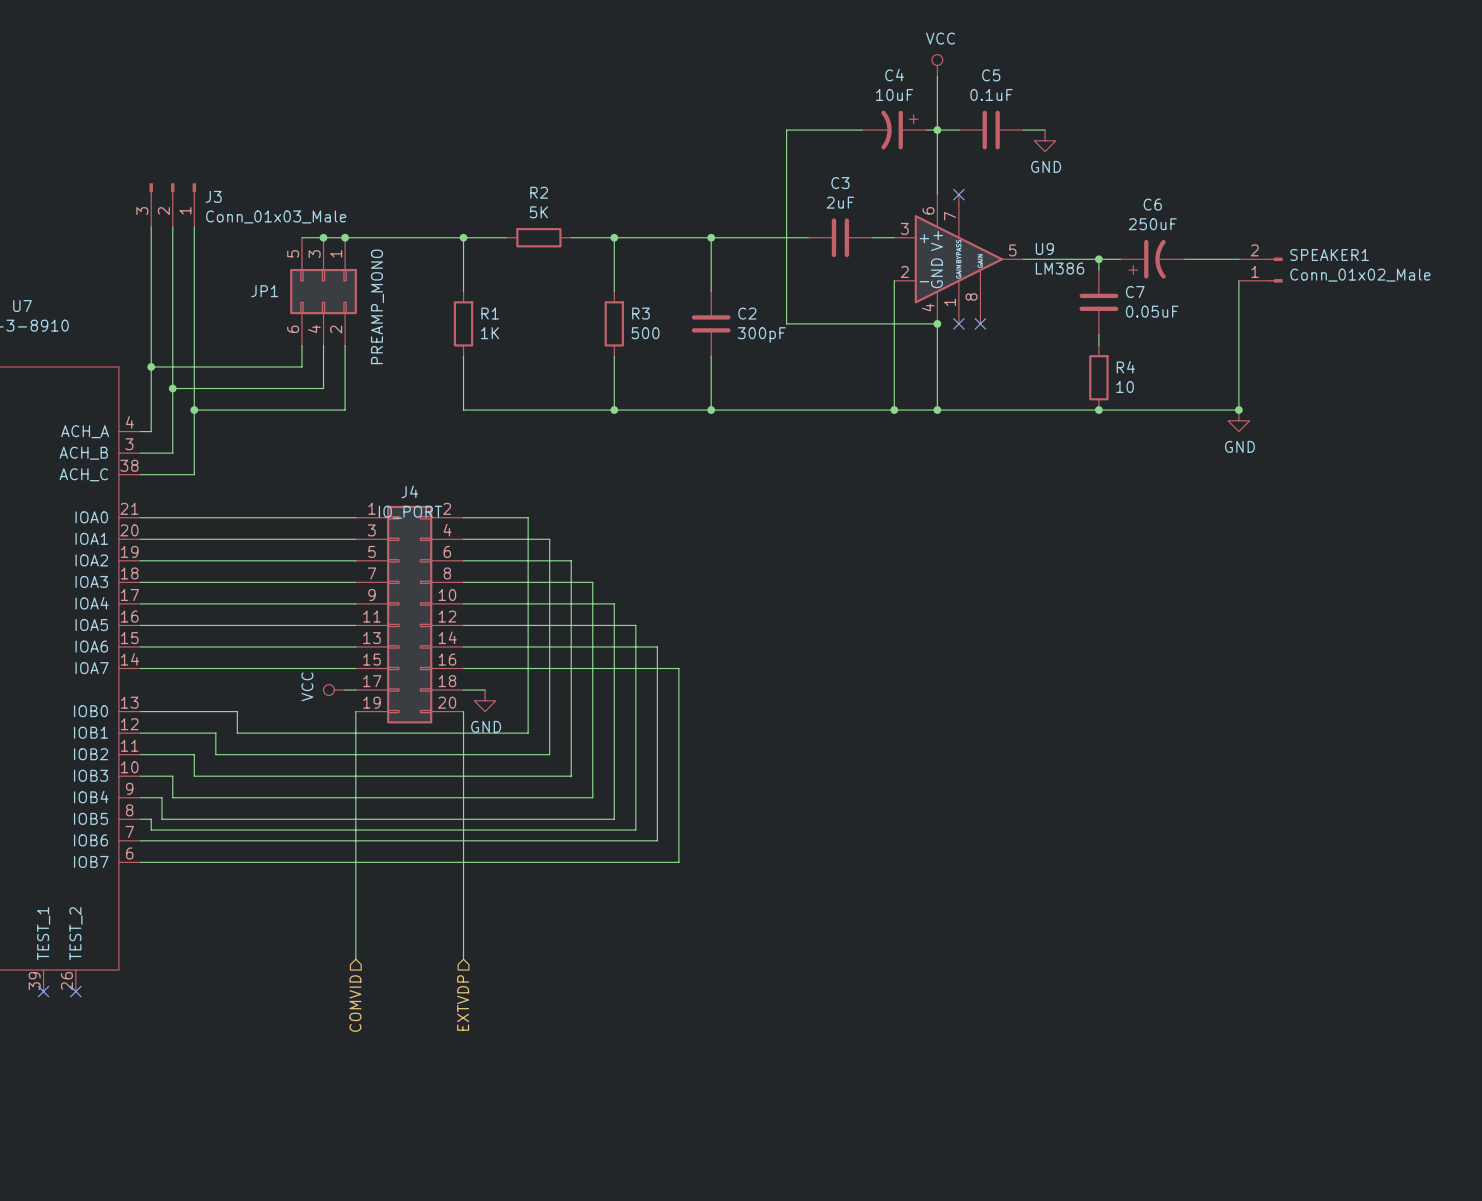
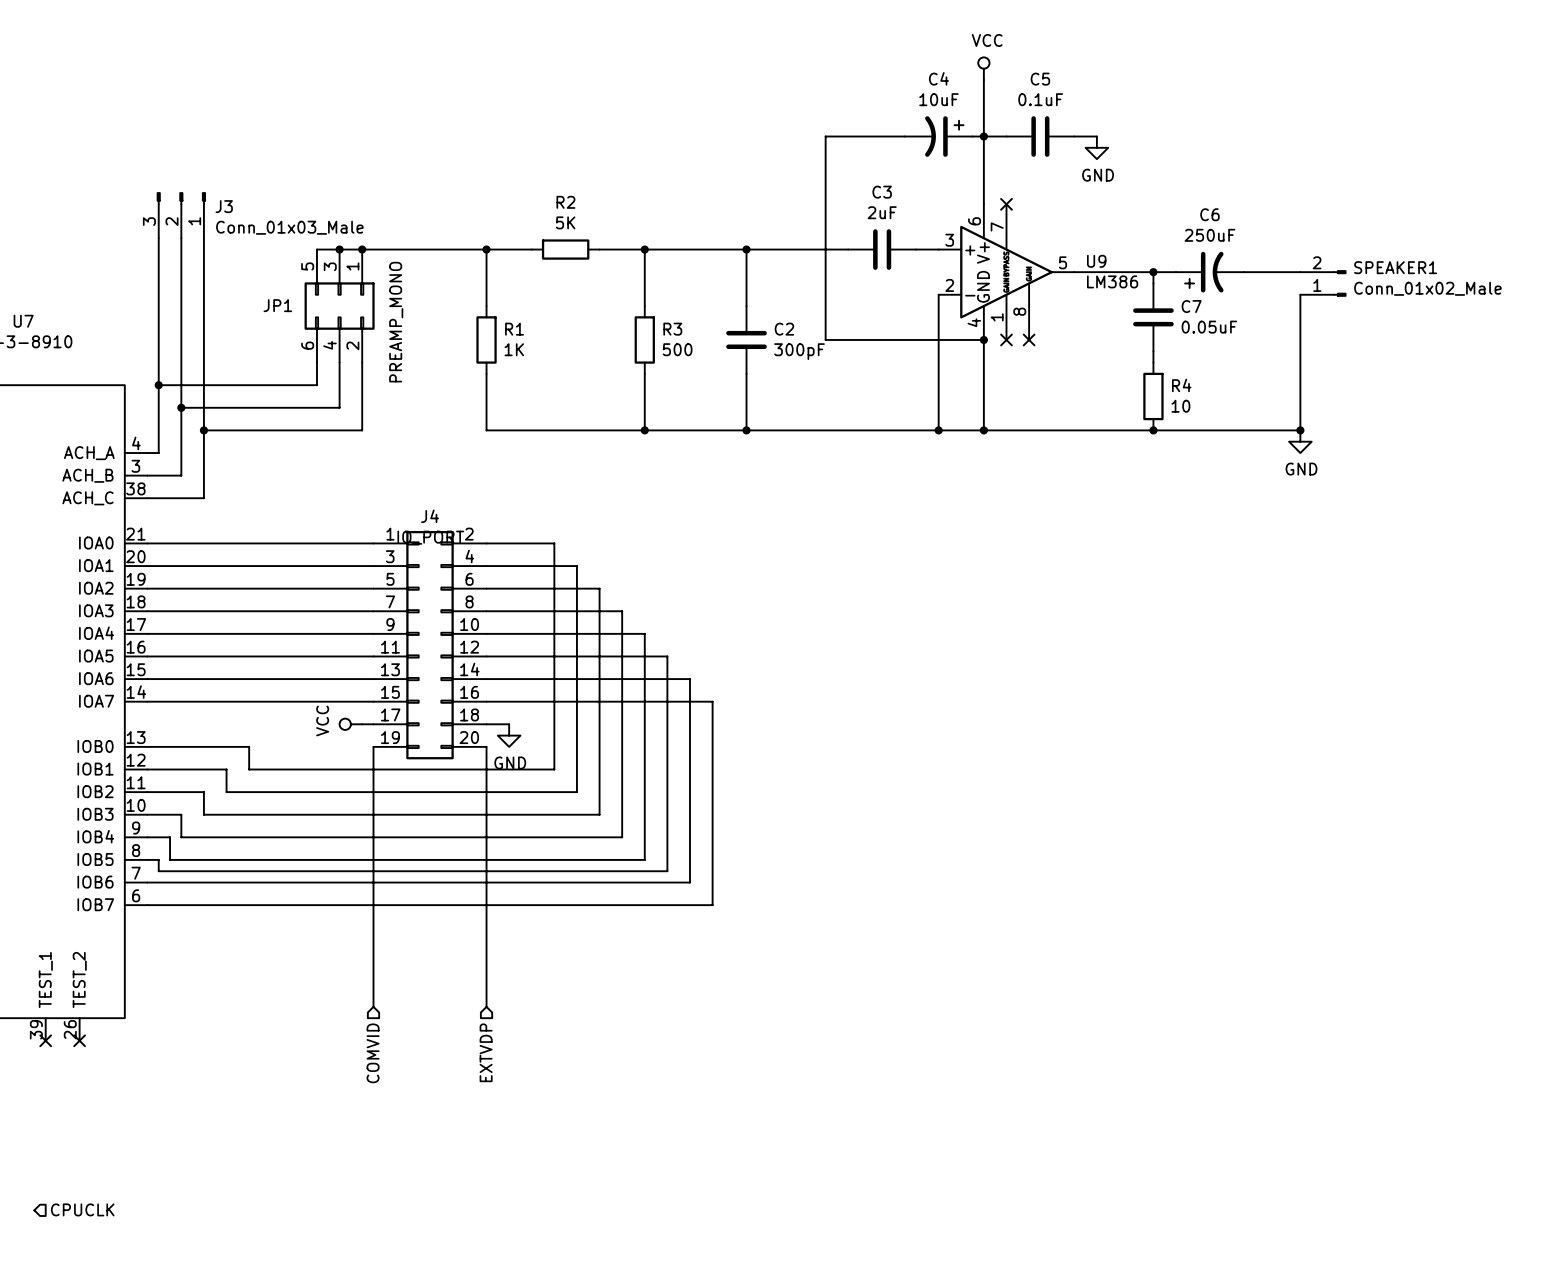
hierarchical label: none -> CPUCLK (82, 1209)

